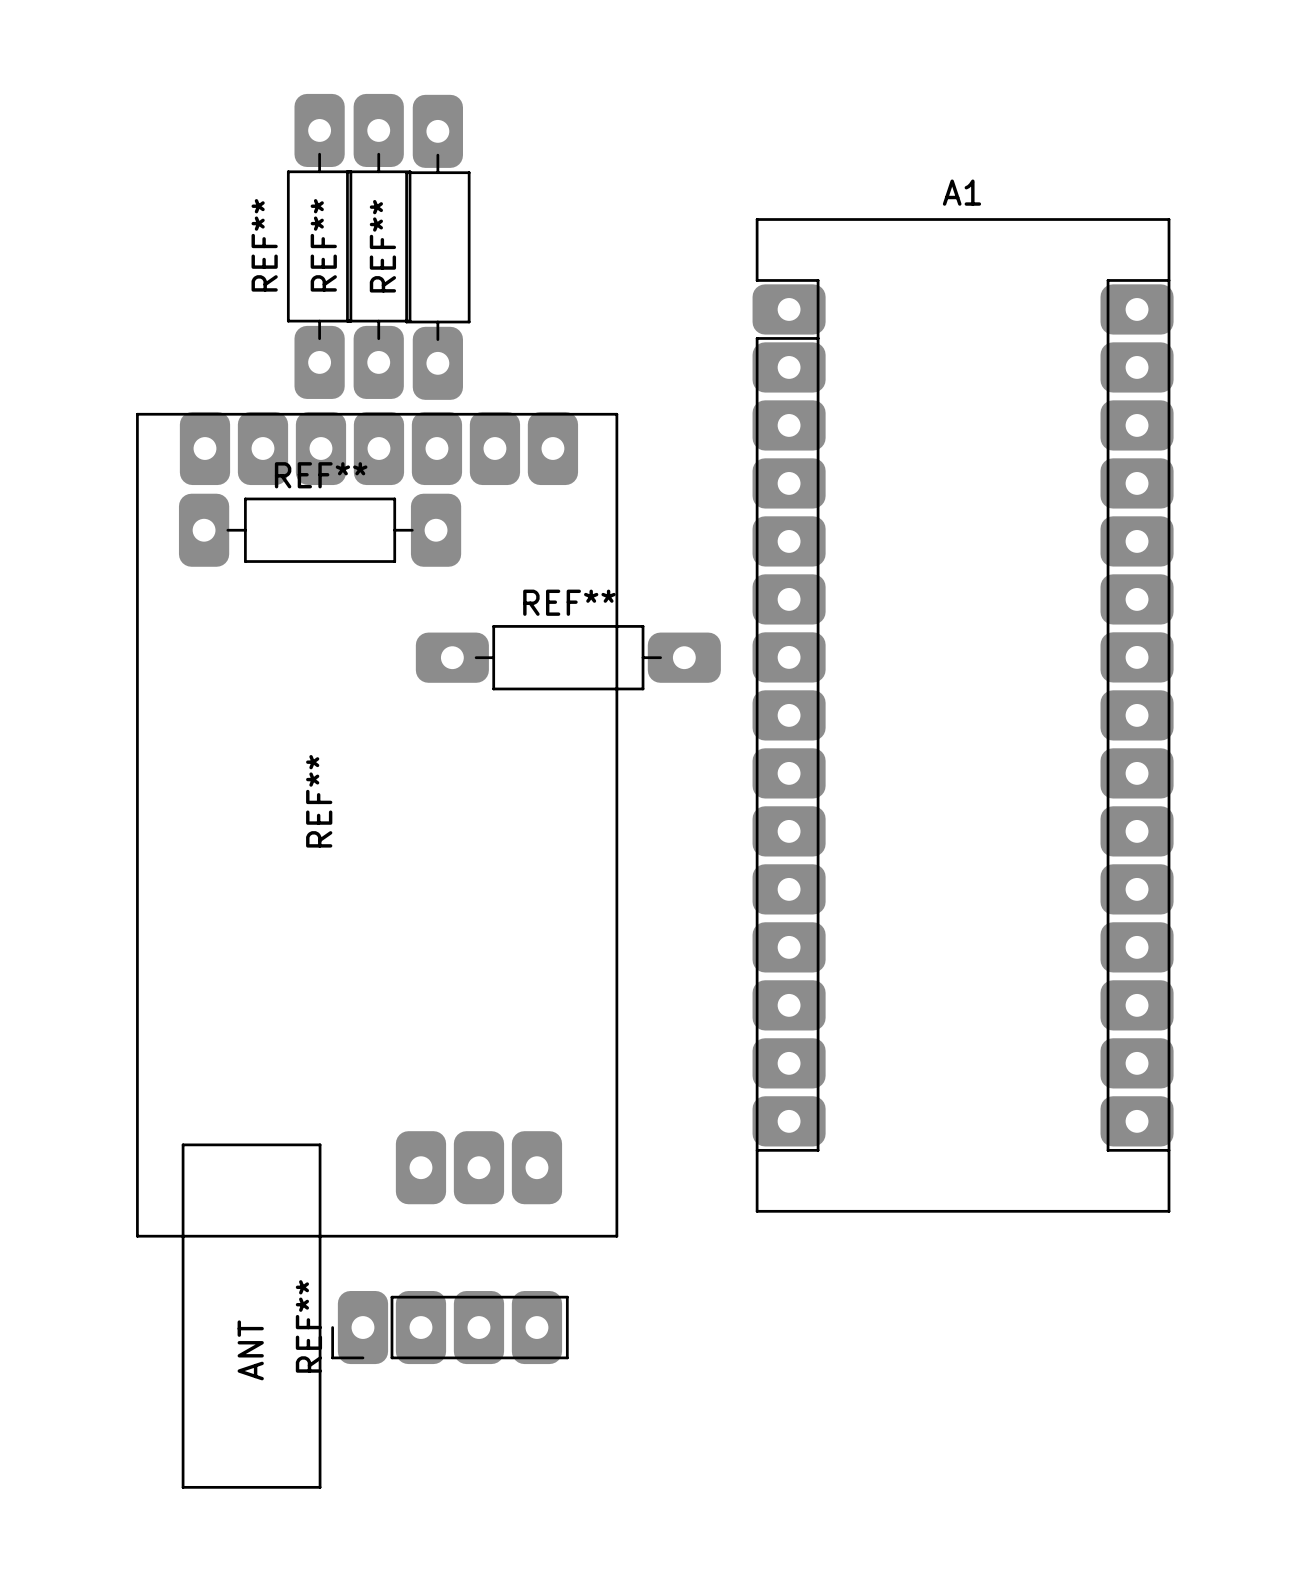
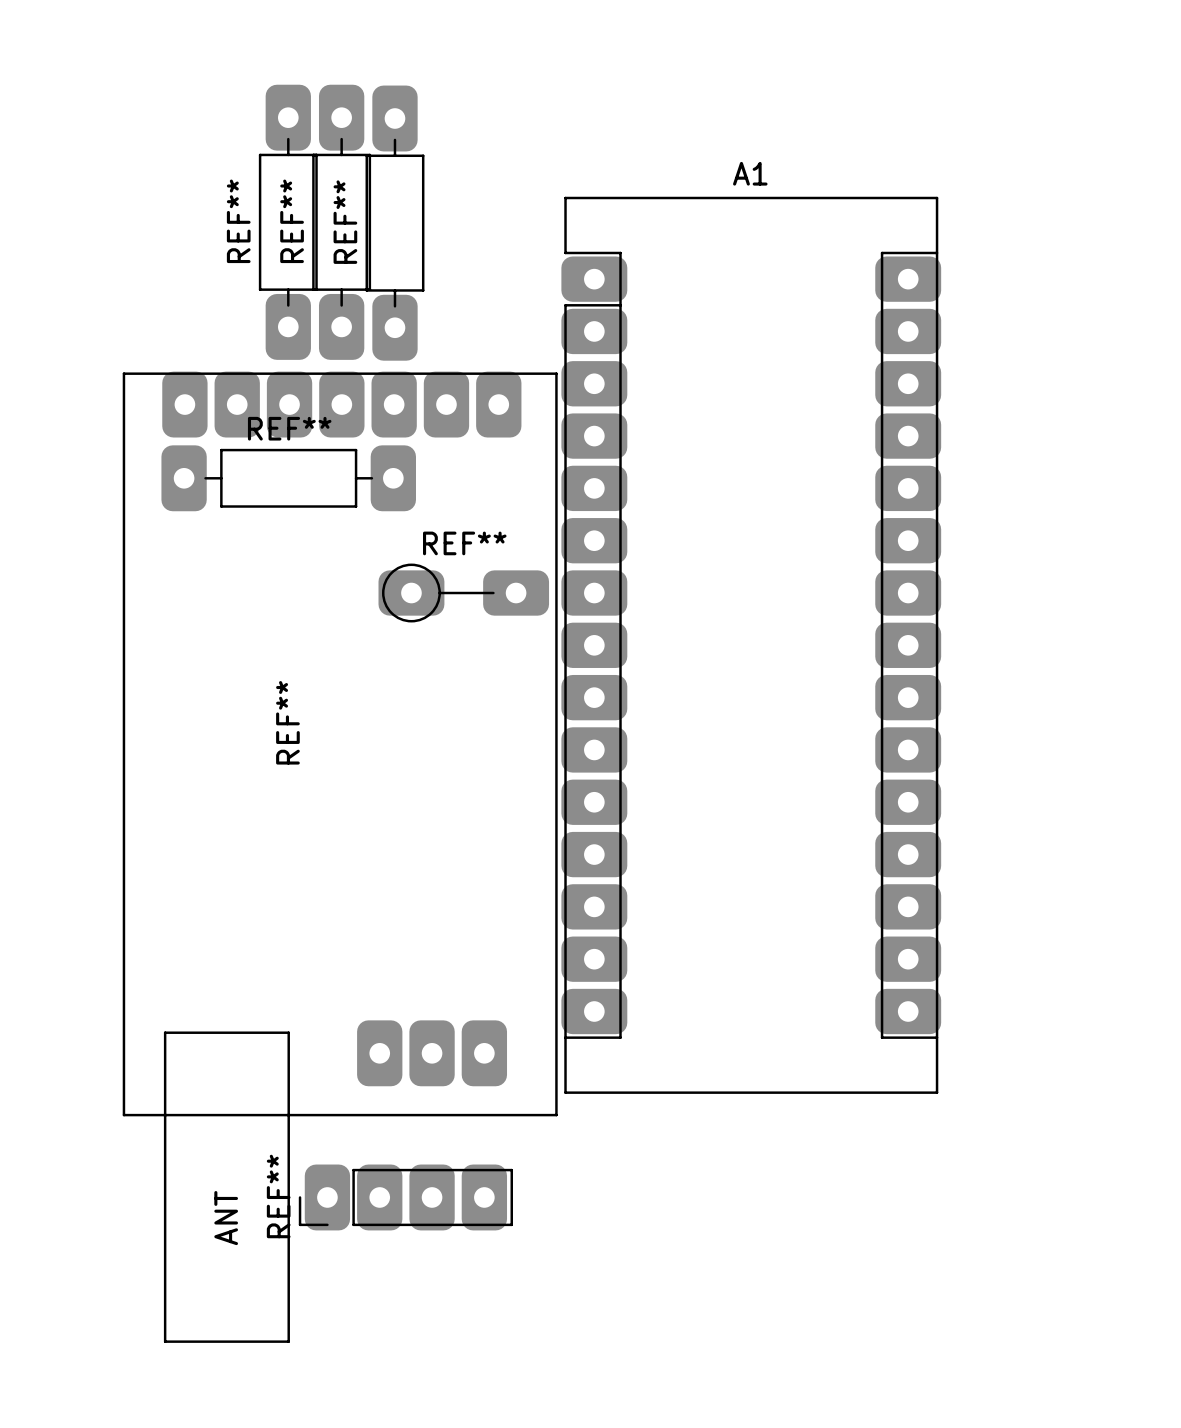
REF**: none -> (463, 593)
REF**: (568, 657) -> none
A1 position: (963, 715) -> (751, 645)

